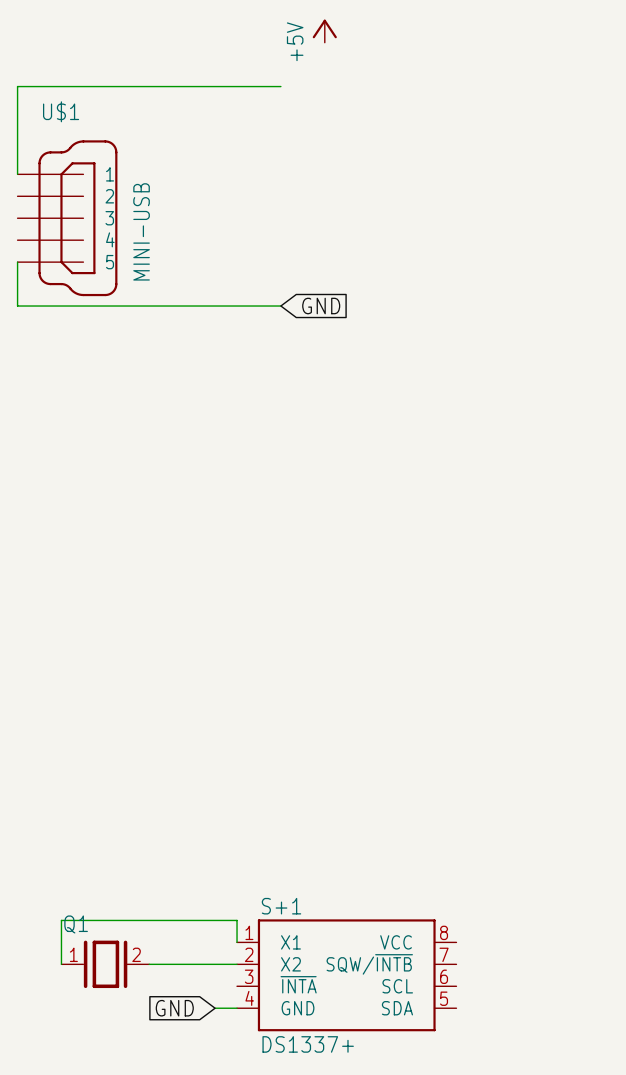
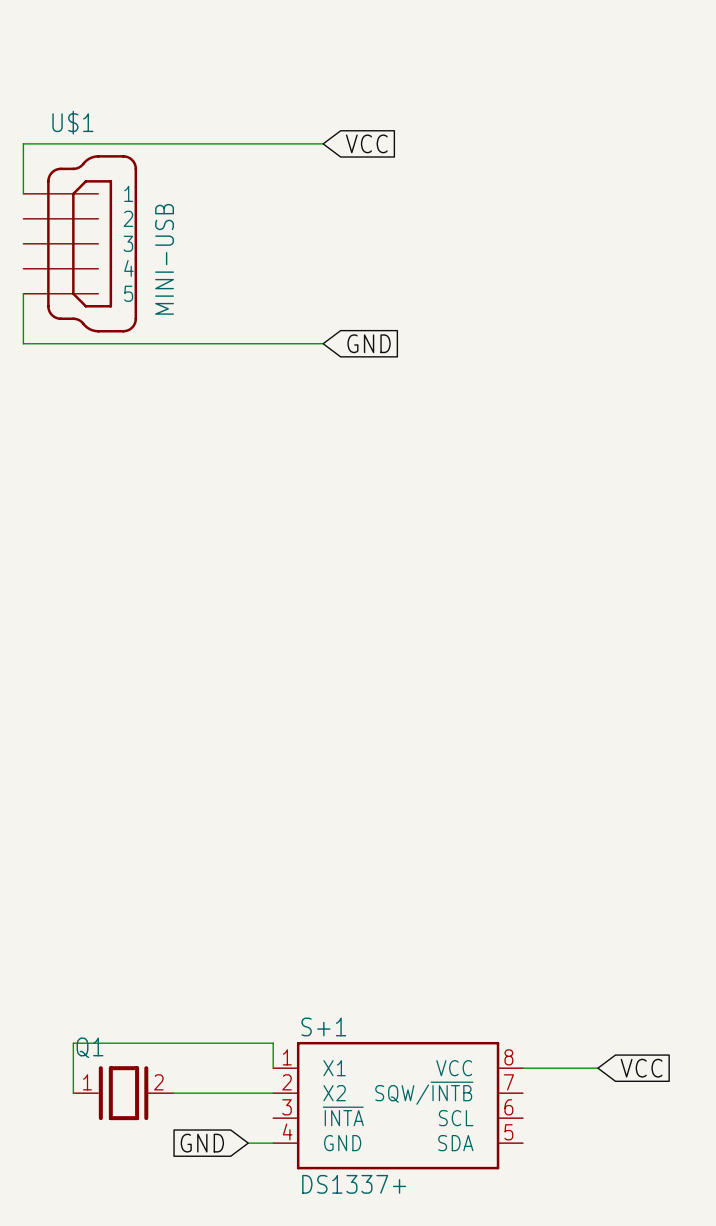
power symbol: +5V (324, 31) -> none
wire: (280, 86) (17, 86) (17, 130) -> (323, 143) (23, 143)
global label: none -> VCC (366, 143)
wire: none -> (523, 1068) (597, 1068)
global label: none -> VCC (641, 1068)

